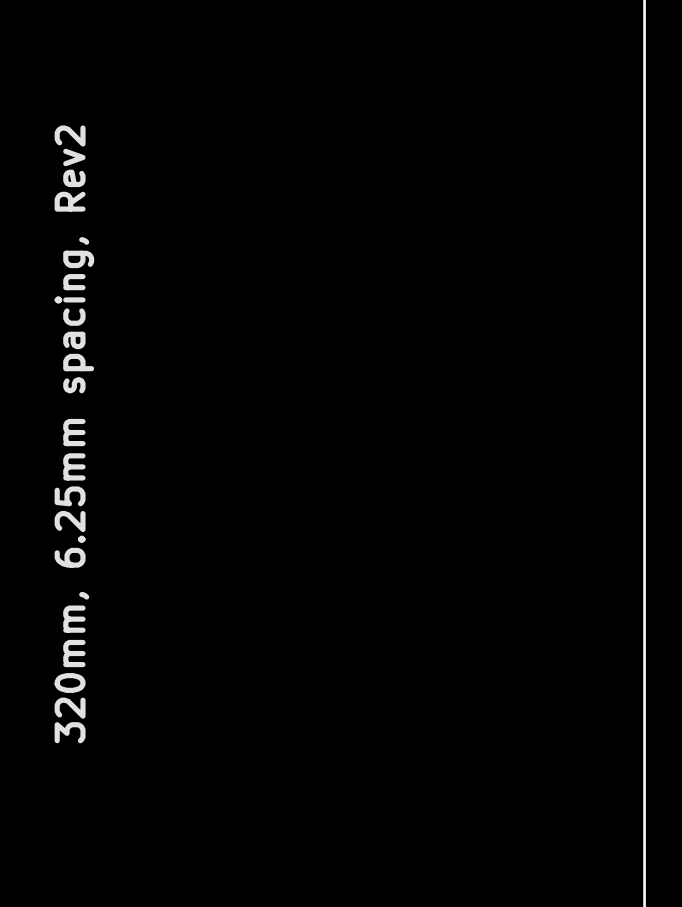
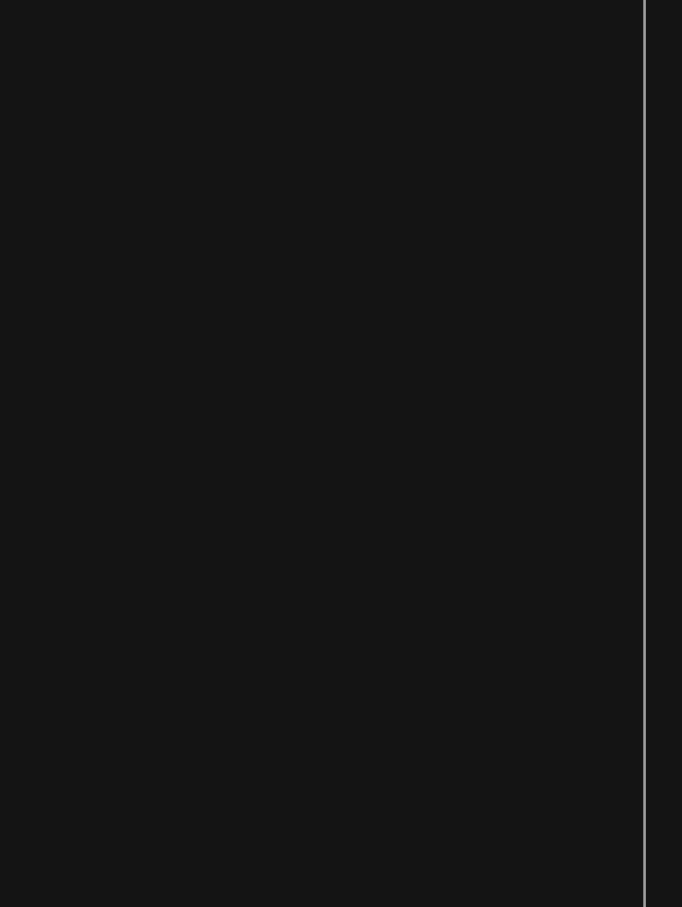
text: 320mm, 6.25mm spacing, Rev2 (74, 434) -> none

